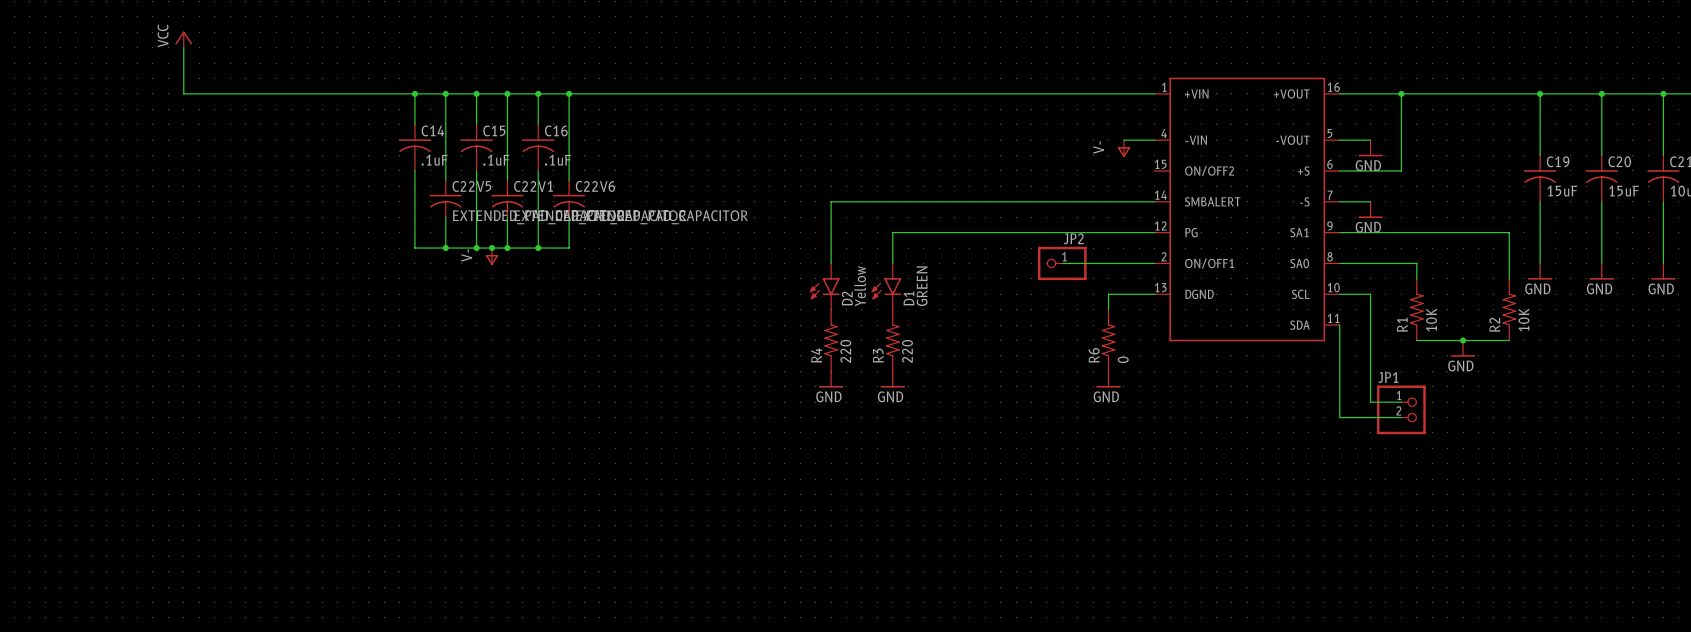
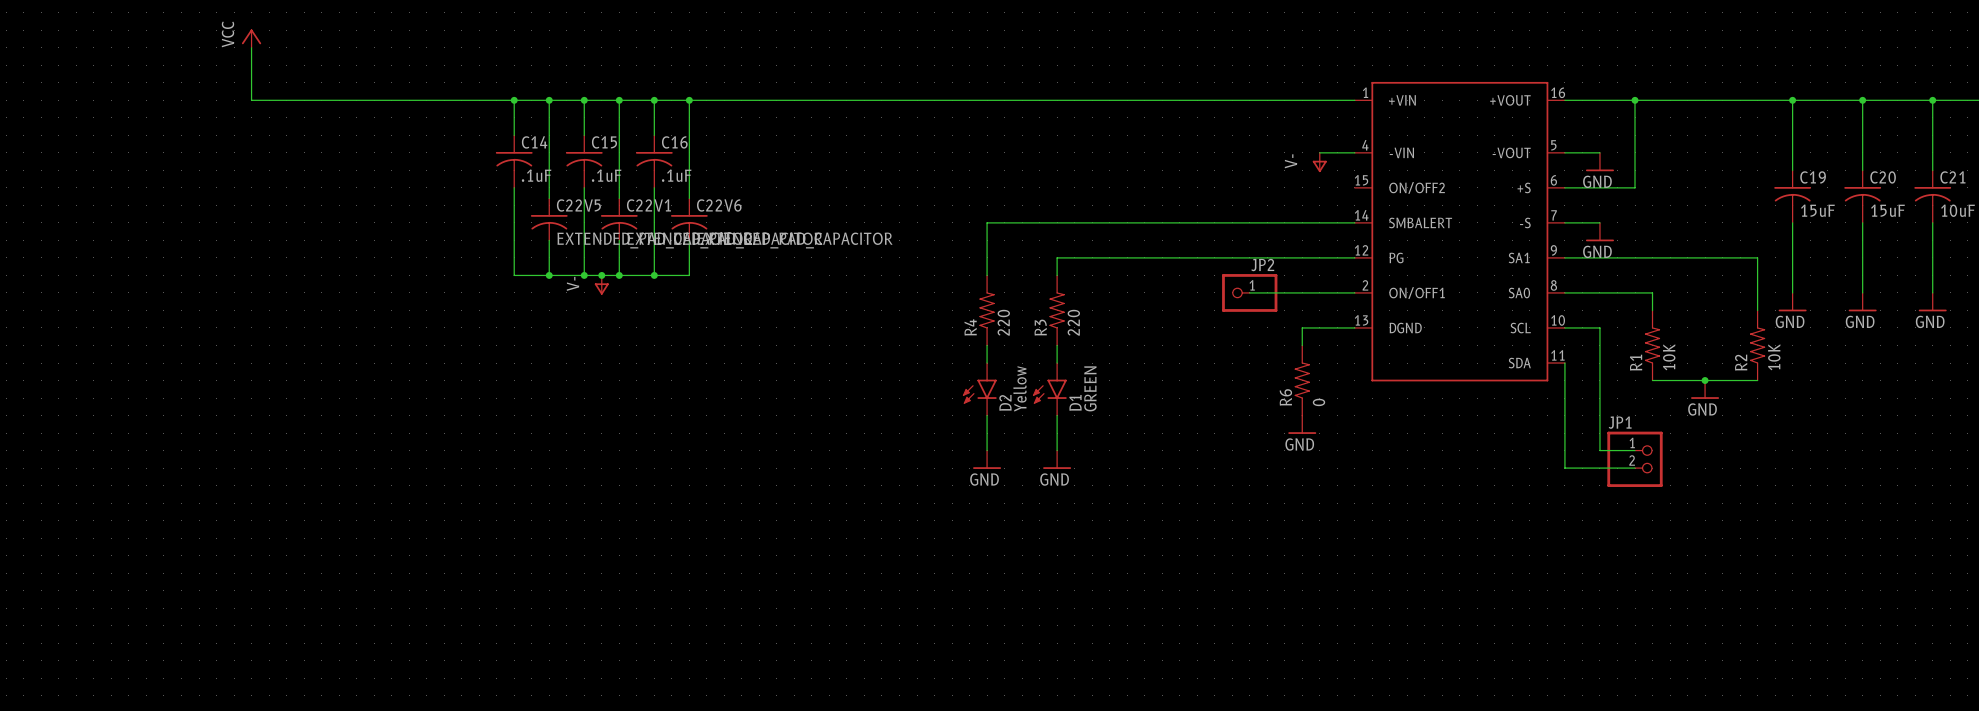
D2 position: (824, 286) -> (979, 389)
D1 position: (886, 286) -> (1049, 389)
R4 position: (831, 340) -> (987, 310)
R3 position: (892, 340) -> (1057, 310)
power symbol position: GND (831, 379) -> GND (987, 459)
power symbol position: GND (892, 379) -> GND (1057, 459)

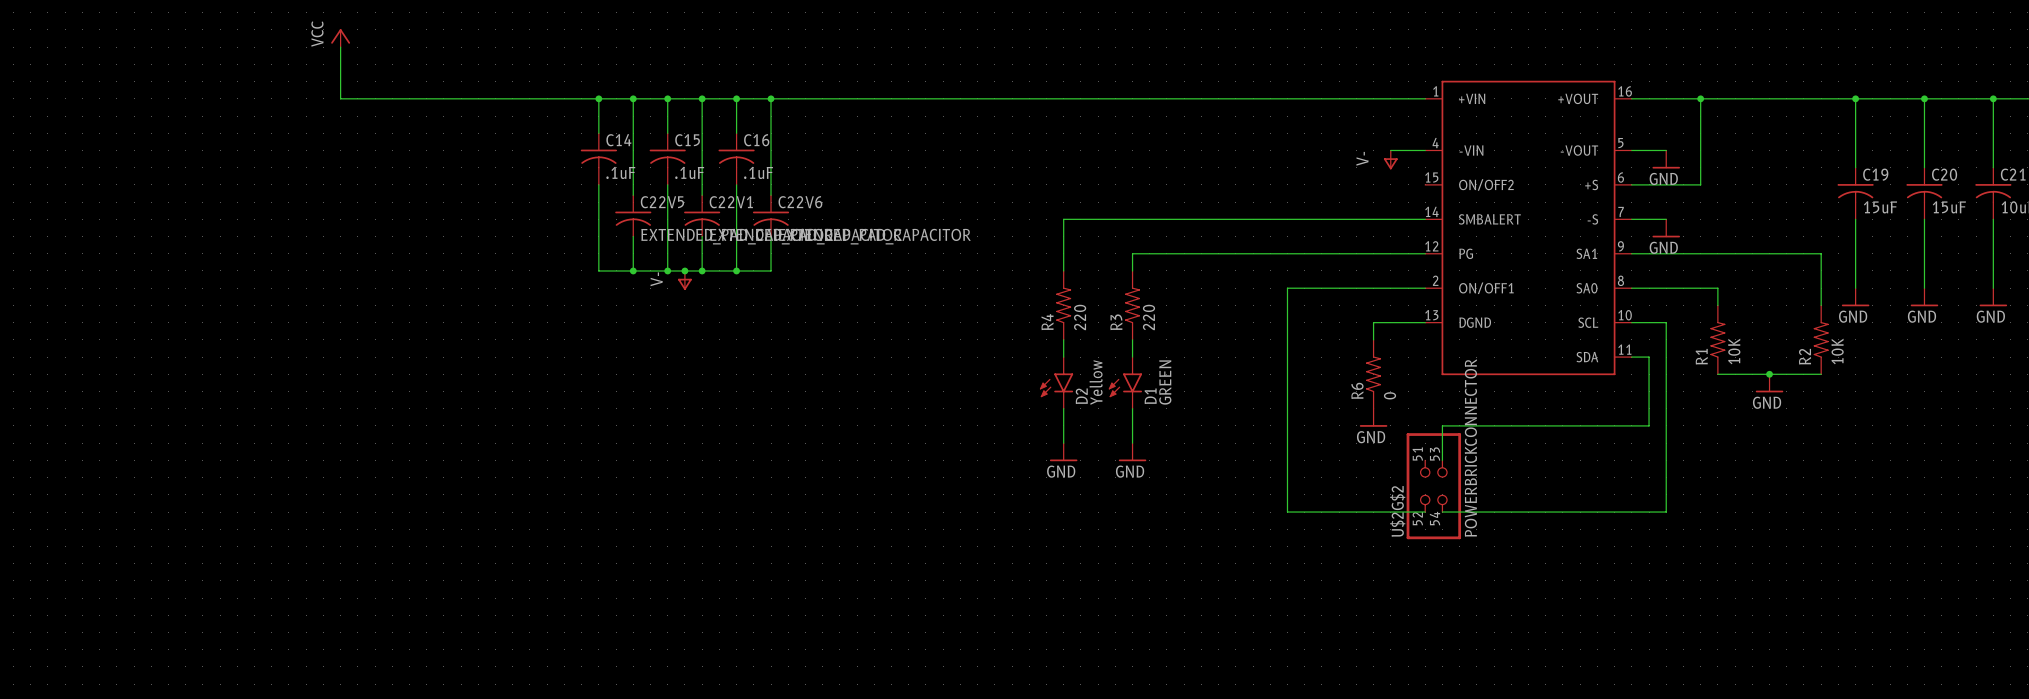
wire: none -> (1321, 288) (1287, 288) (1287, 512) (1425, 512)
JP2: (1249, 292) -> none
wire: (1564, 363) (1564, 468) (1635, 468) -> (1631, 357) (1649, 357) (1649, 425) (1442, 425) (1442, 460)
wire: (1599, 450) (1635, 450) -> (1666, 443) (1666, 512) (1442, 512)
JP1: (1635, 459) -> none
U$2G$2: none -> POWERBRICKCONNECTOR (1433, 486)

